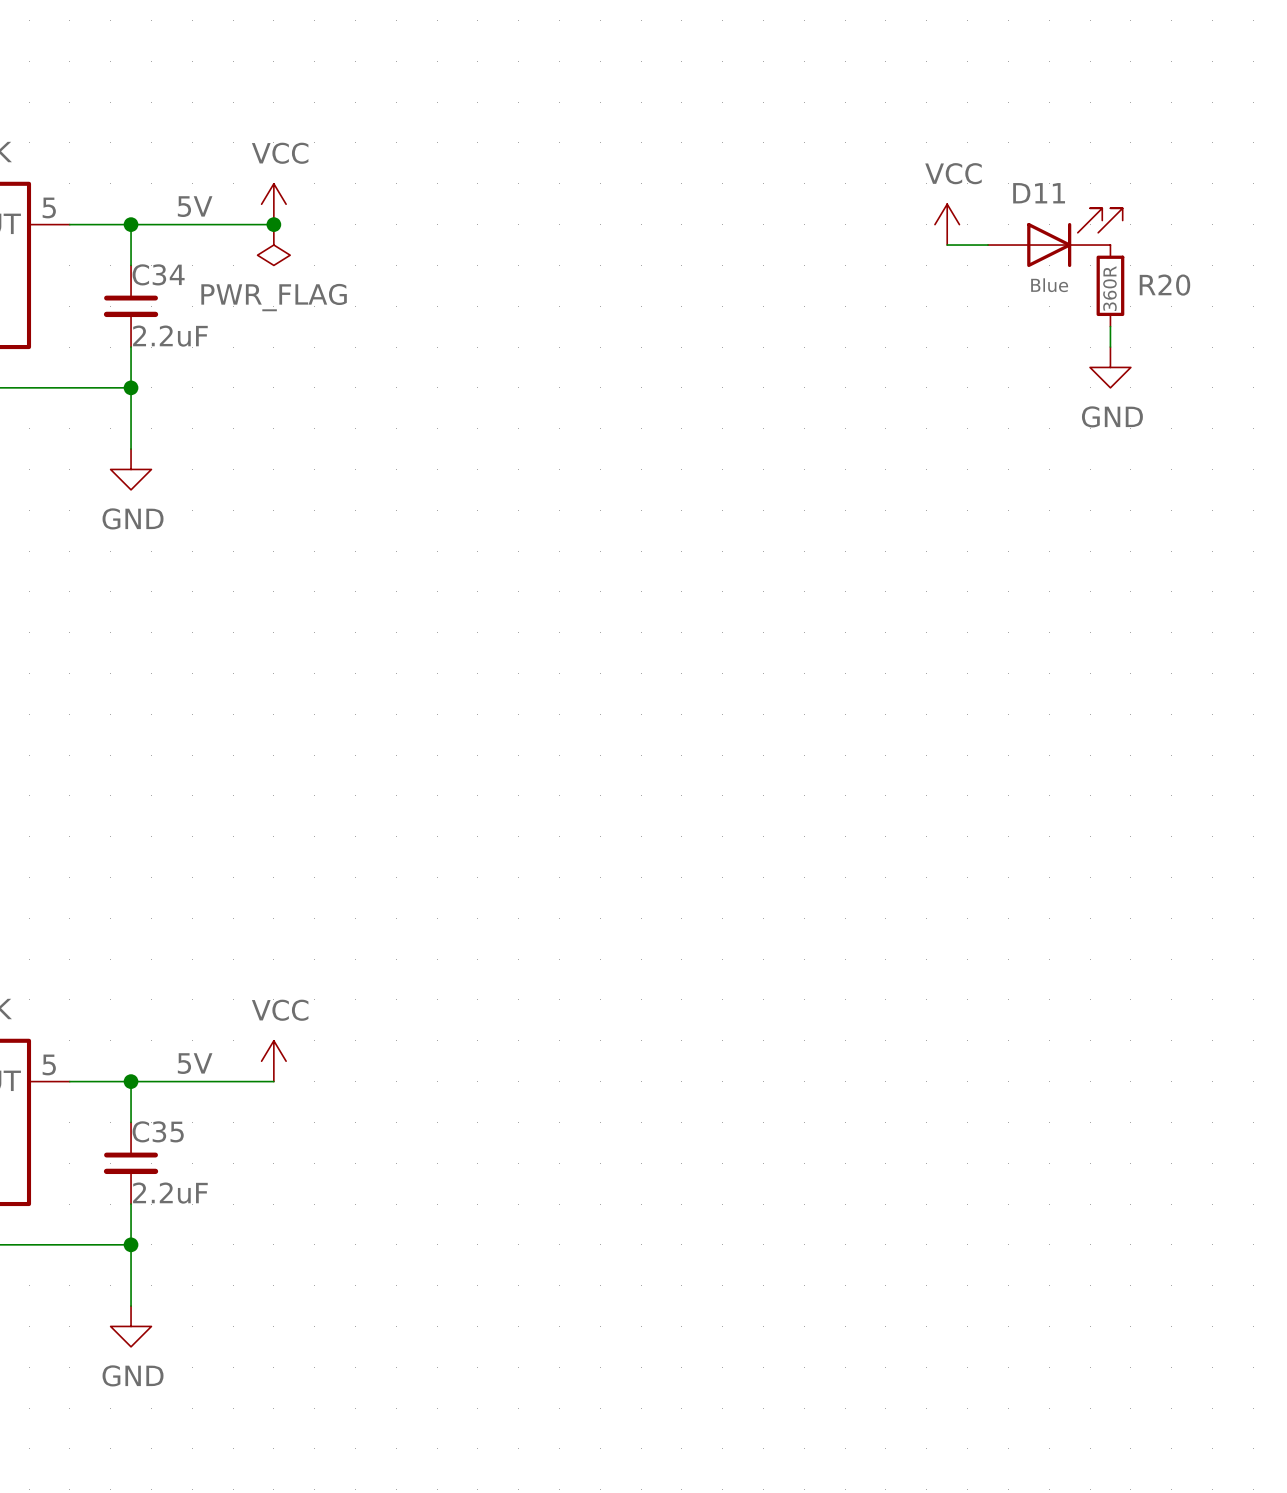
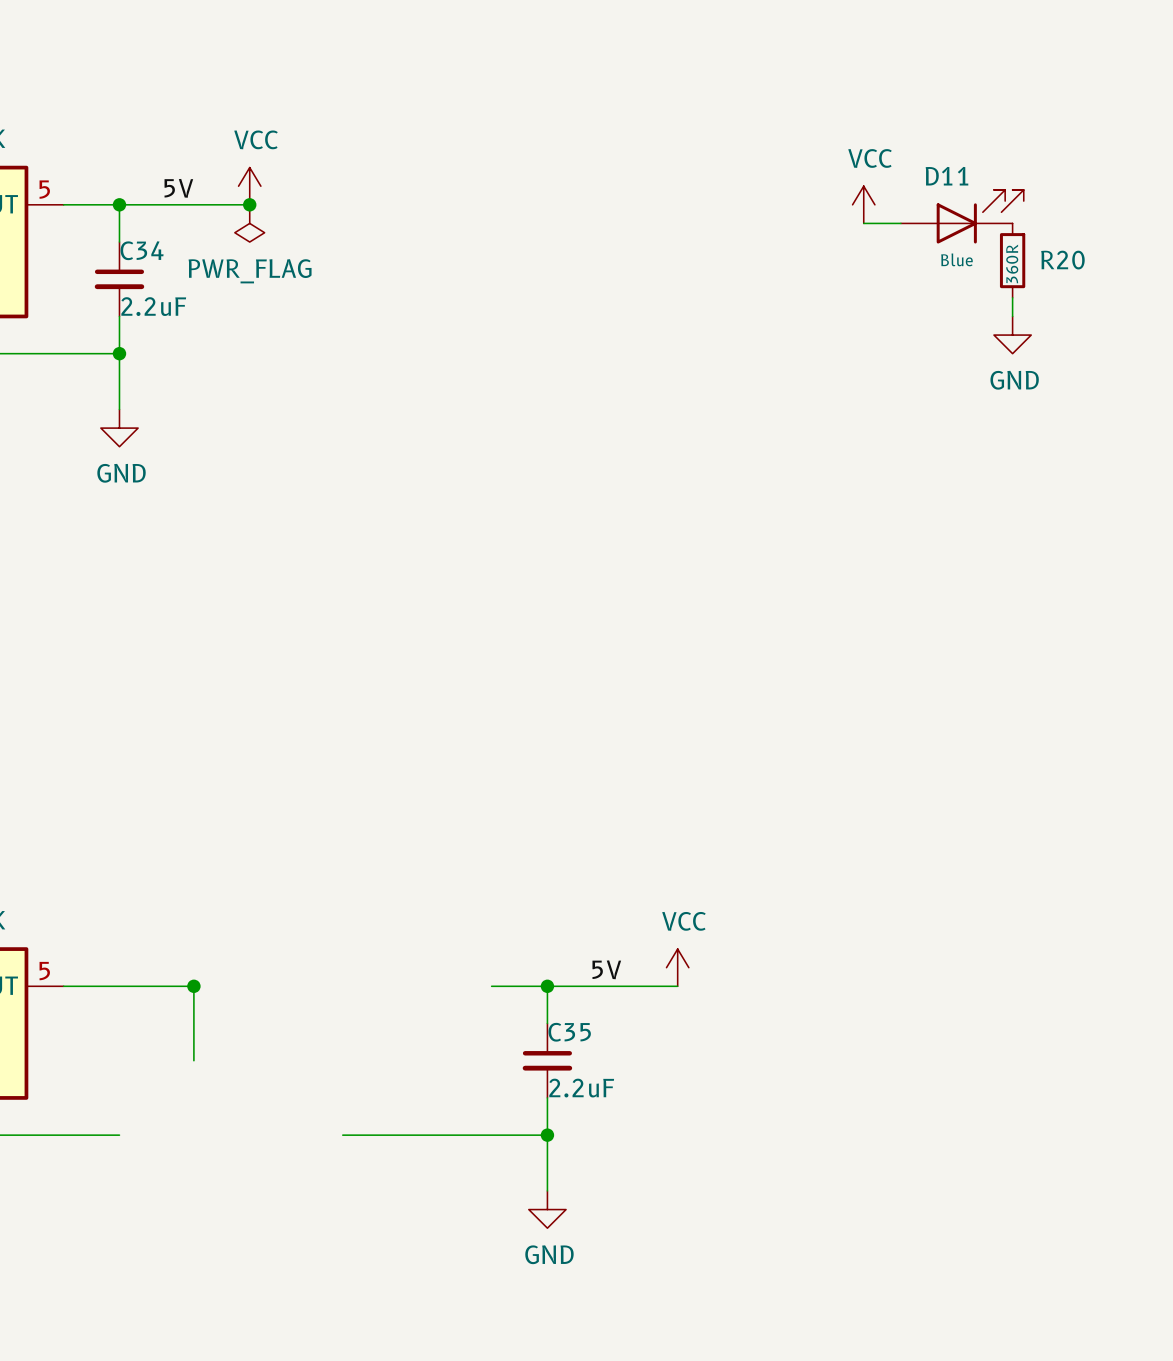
power symbol: VCC (273, 1061) -> none
power symbol: none -> VCC (677, 967)
label: 5V (195, 1063) -> none
label: none -> 5V (606, 969)
wire: (131, 1081) (131, 1122) -> none
junction position: (131, 1081) -> (193, 986)
wire: (212, 1081) (273, 1081) -> (193, 986) (193, 1060)
wire: none -> (491, 986) (677, 986)
wire: none -> (547, 986) (547, 1023)
junction: none -> (547, 986)
C35 position: (131, 1163) -> (547, 1060)
wire: (131, 1204) (131, 1306) -> none
wire: none -> (547, 1097) (547, 1190)
junction: (131, 1244) -> none
wire: none -> (342, 1135) (547, 1135)
junction: none -> (547, 1135)
power symbol: GND (131, 1326) -> none
power symbol: none -> GND (547, 1209)

